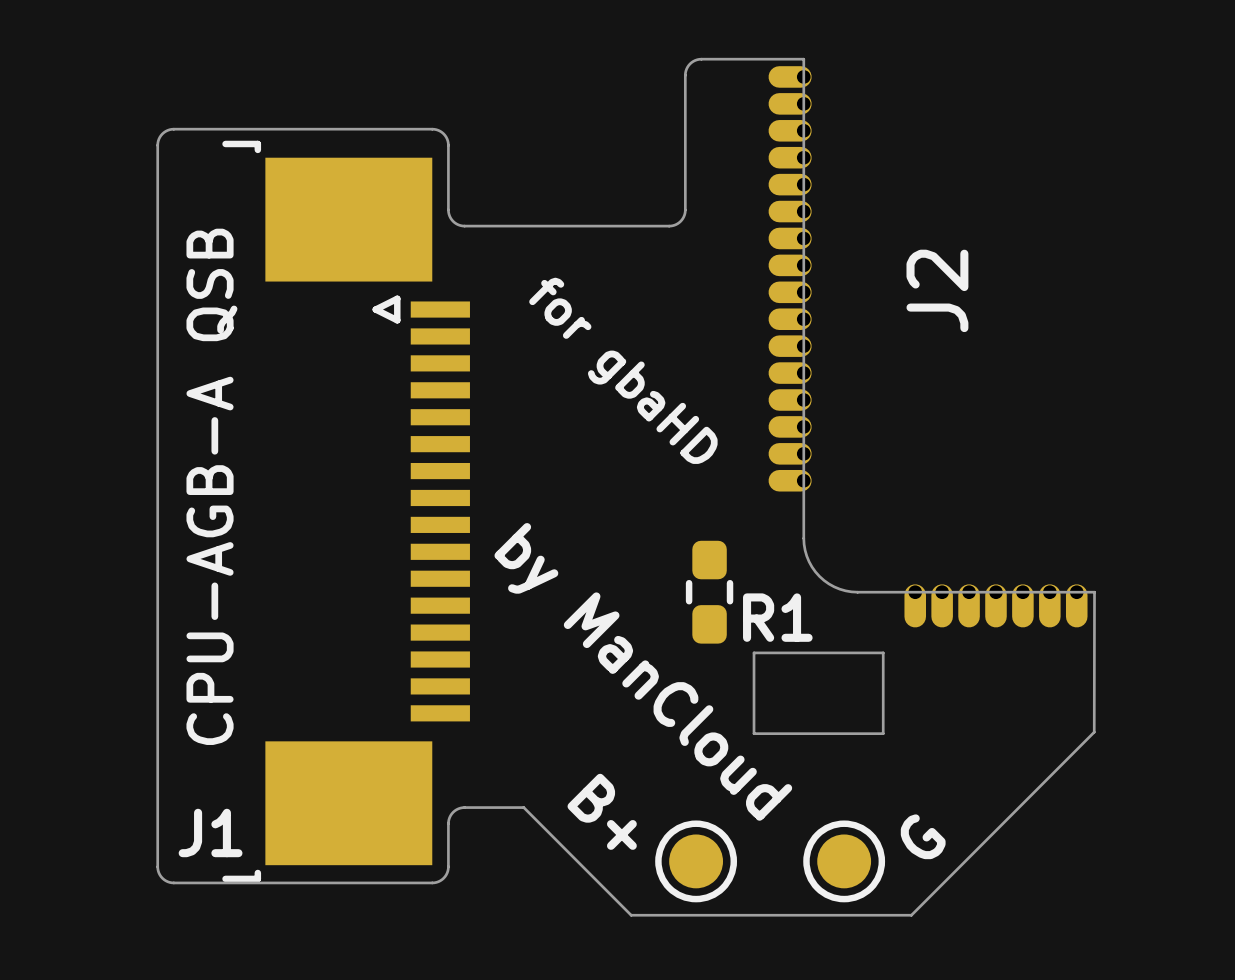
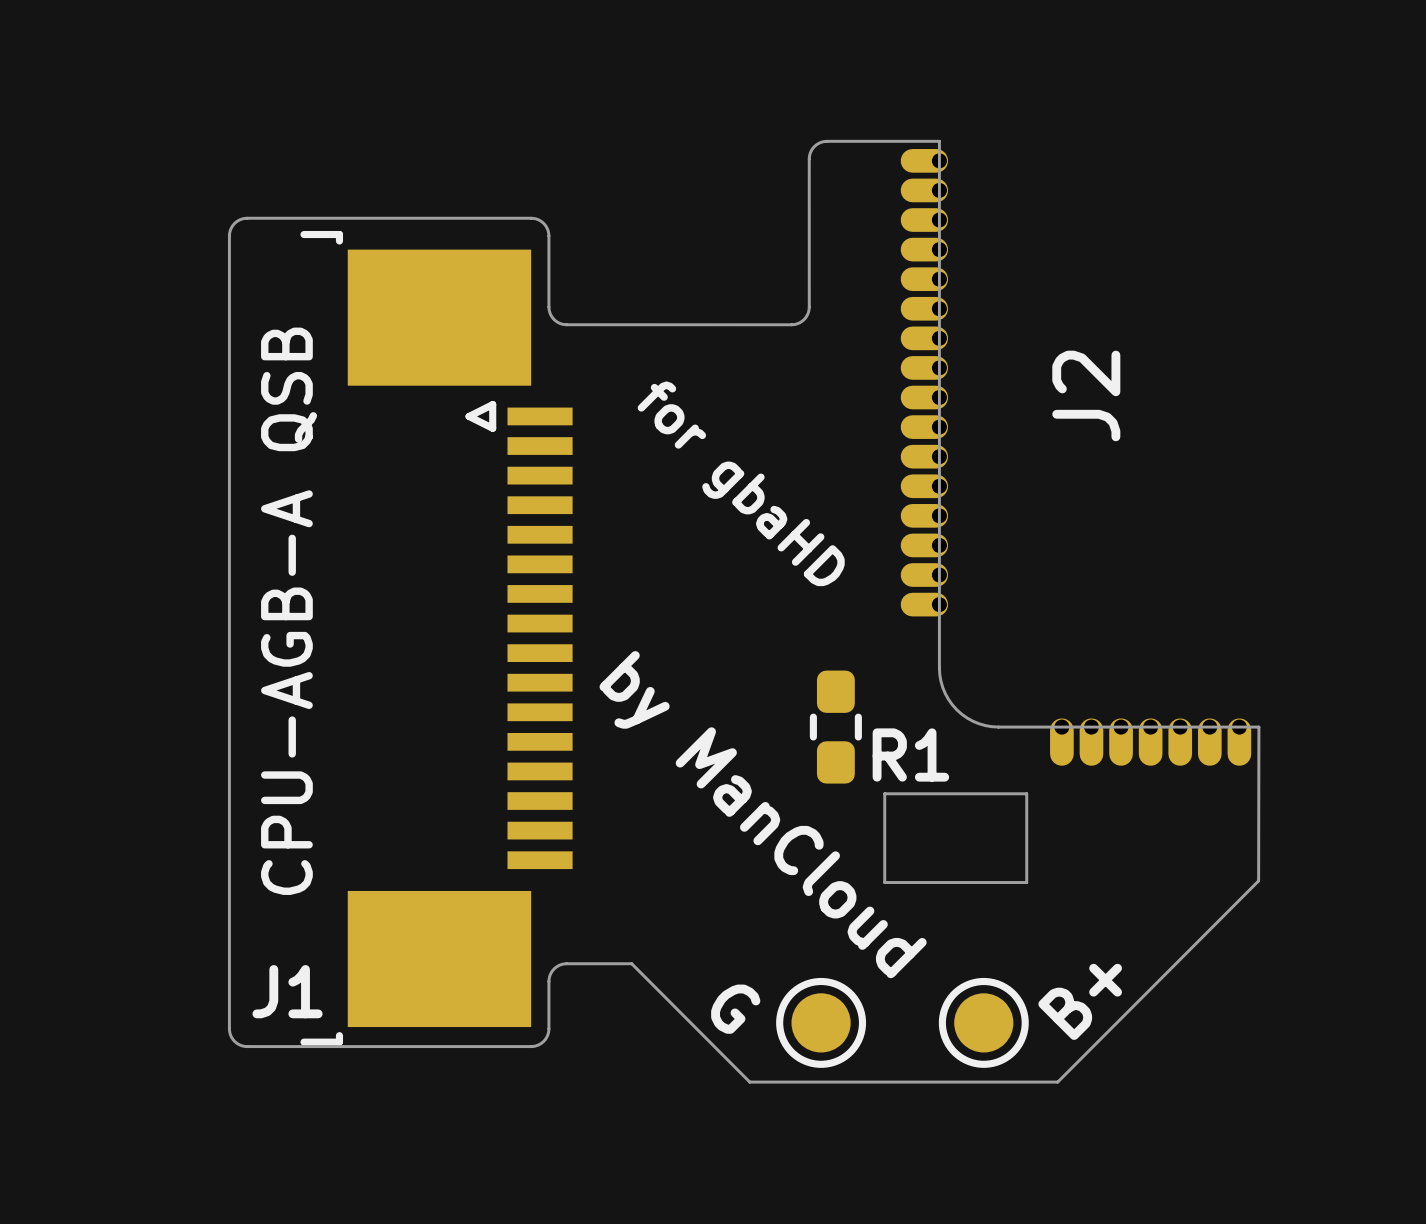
B+ name: B+ (602, 811) -> G (735, 1009)
G name: G (923, 836) -> B+ (1080, 1001)

